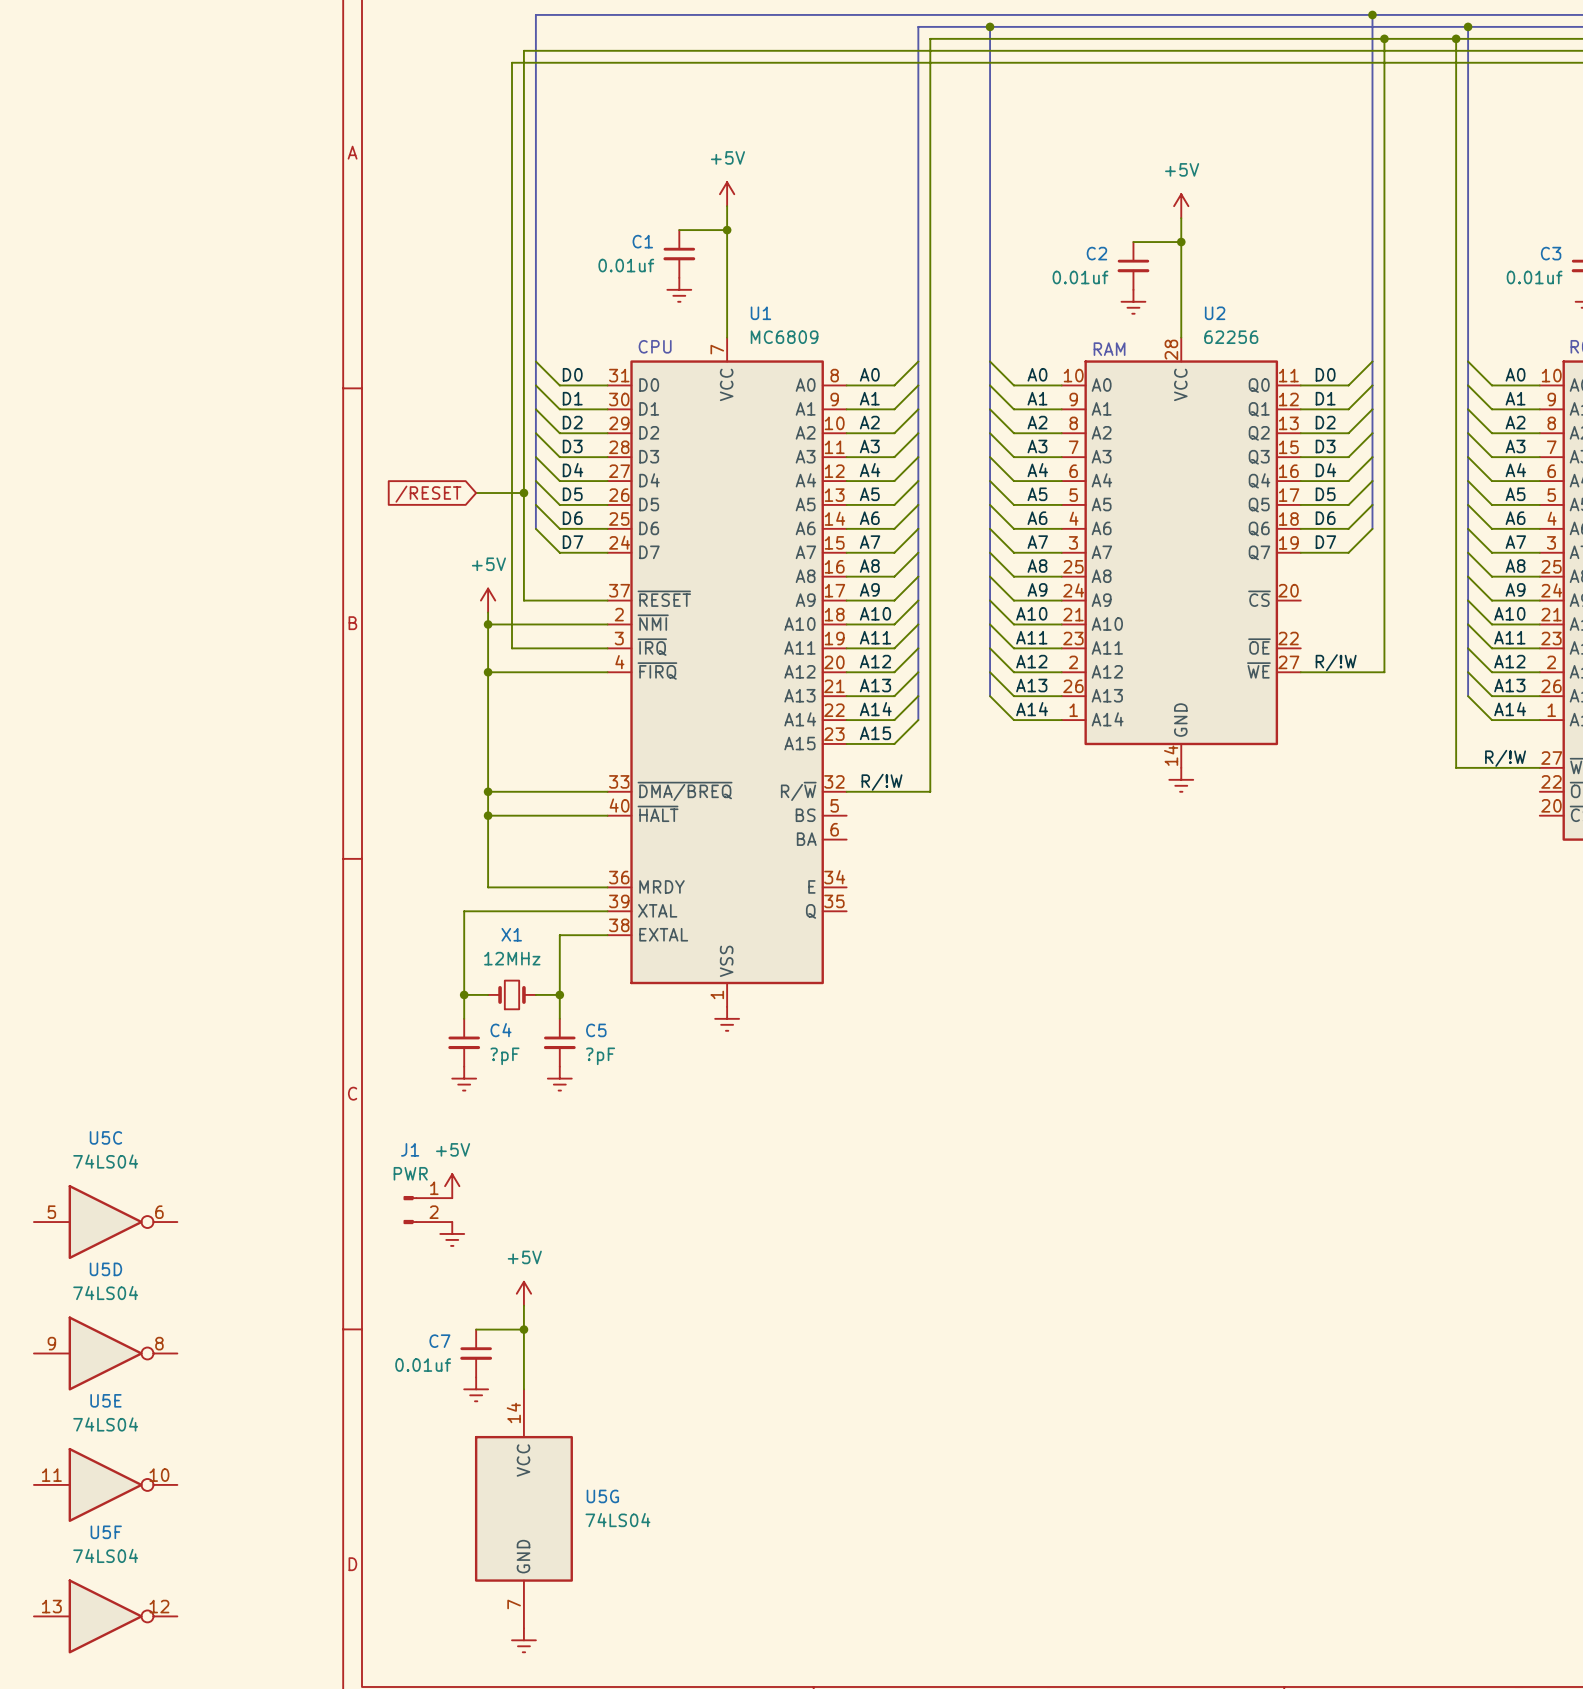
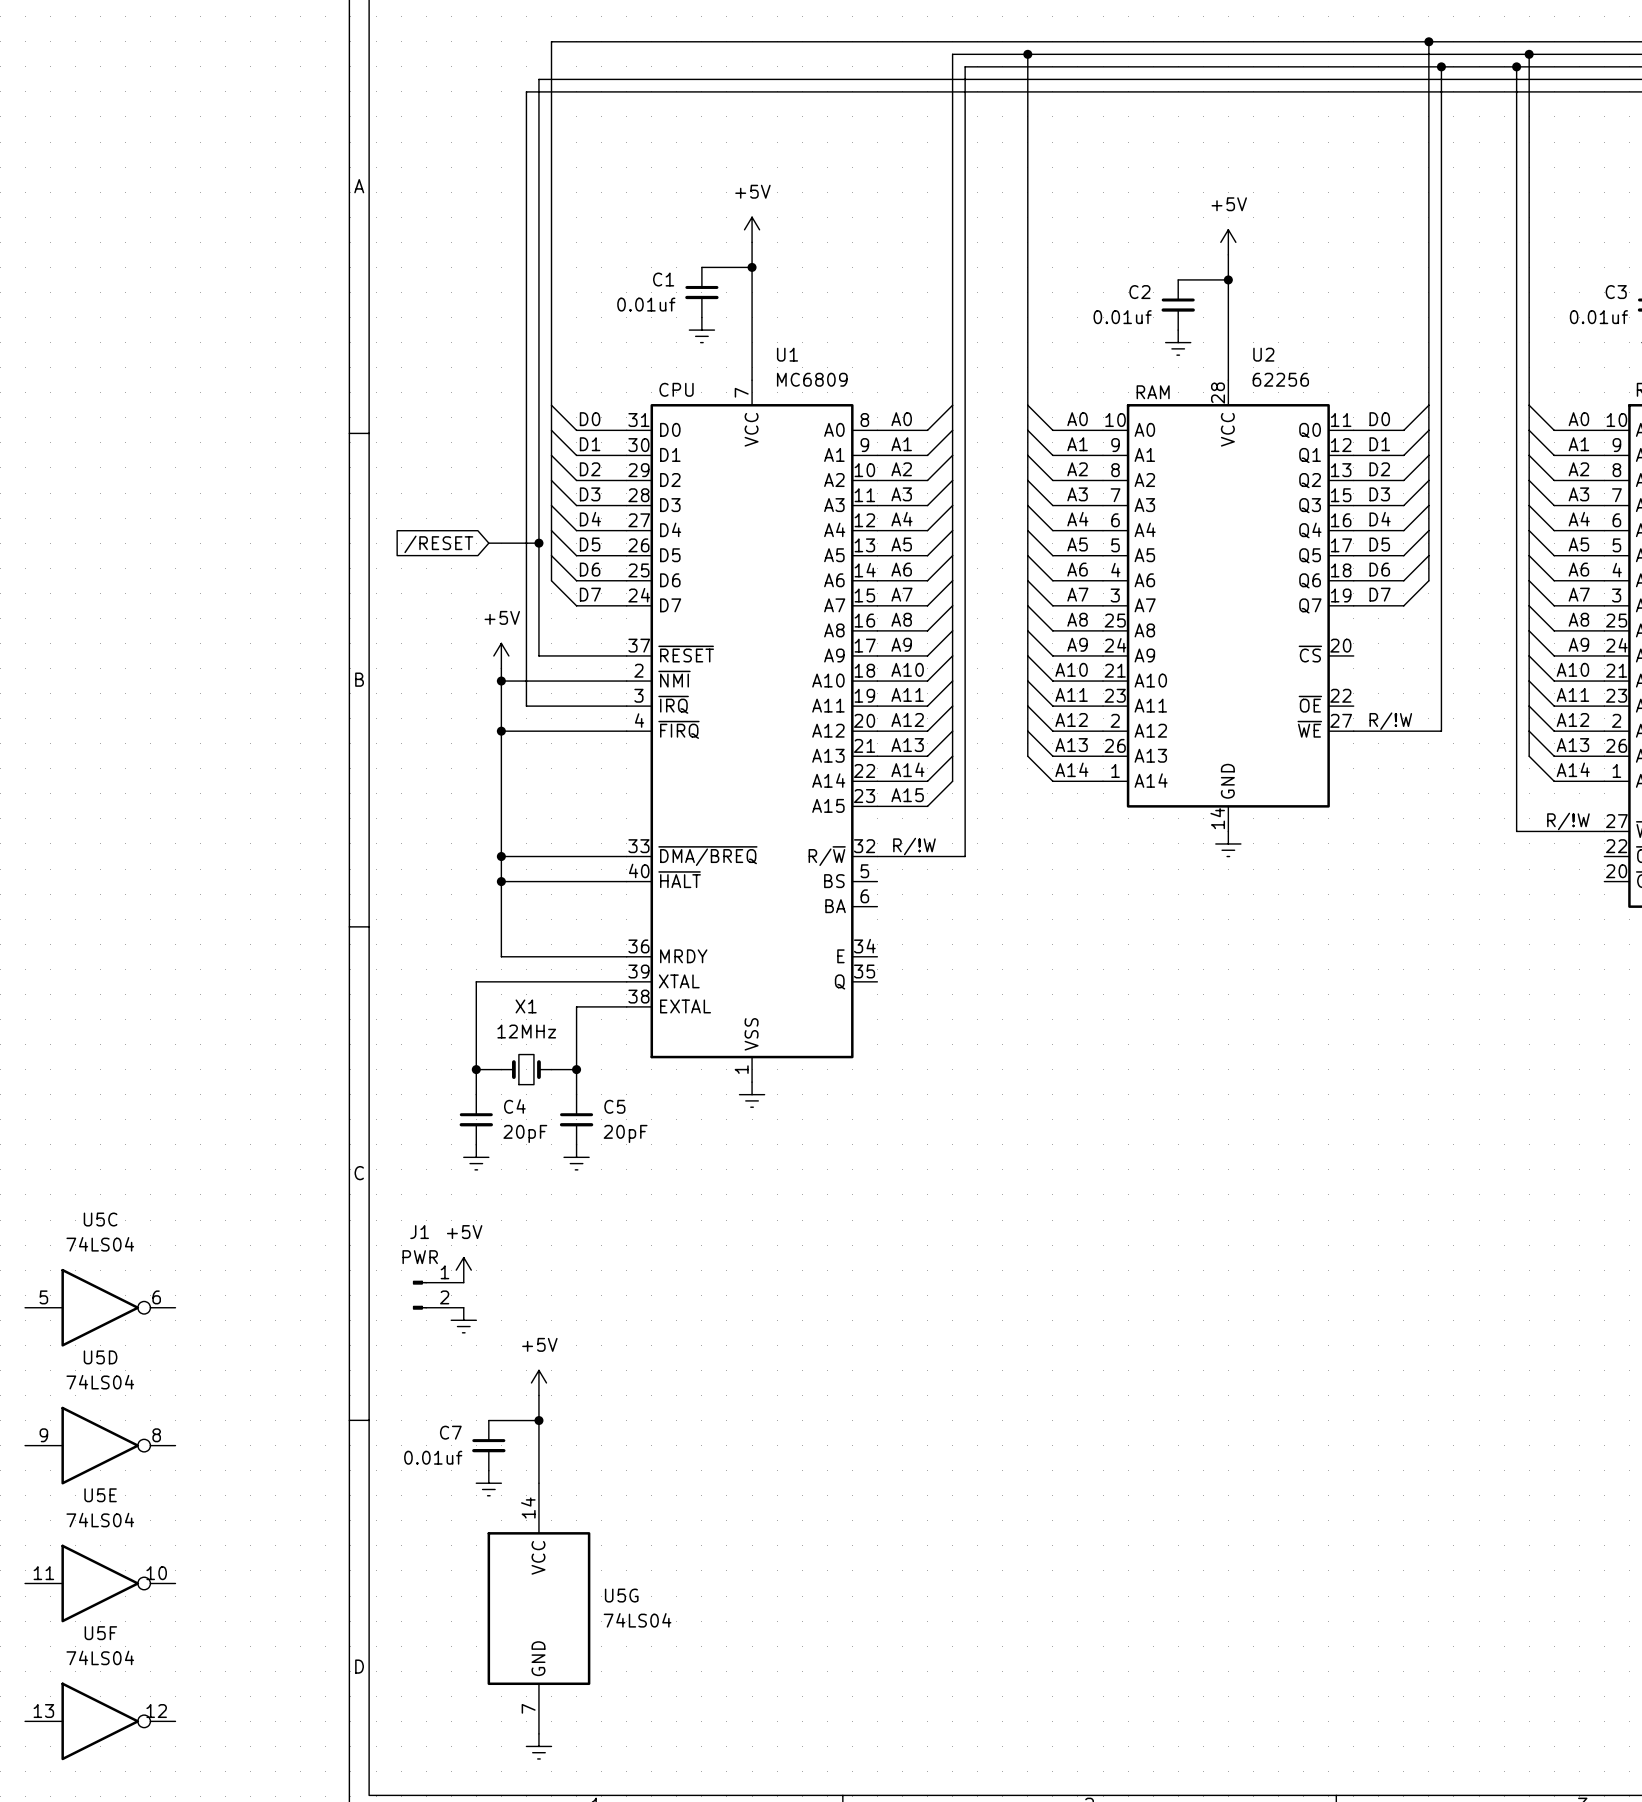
C4 value: ?pF (504, 1056) -> 20pF (525, 1133)
C5 value: ?pF (600, 1056) -> 20pF (625, 1133)

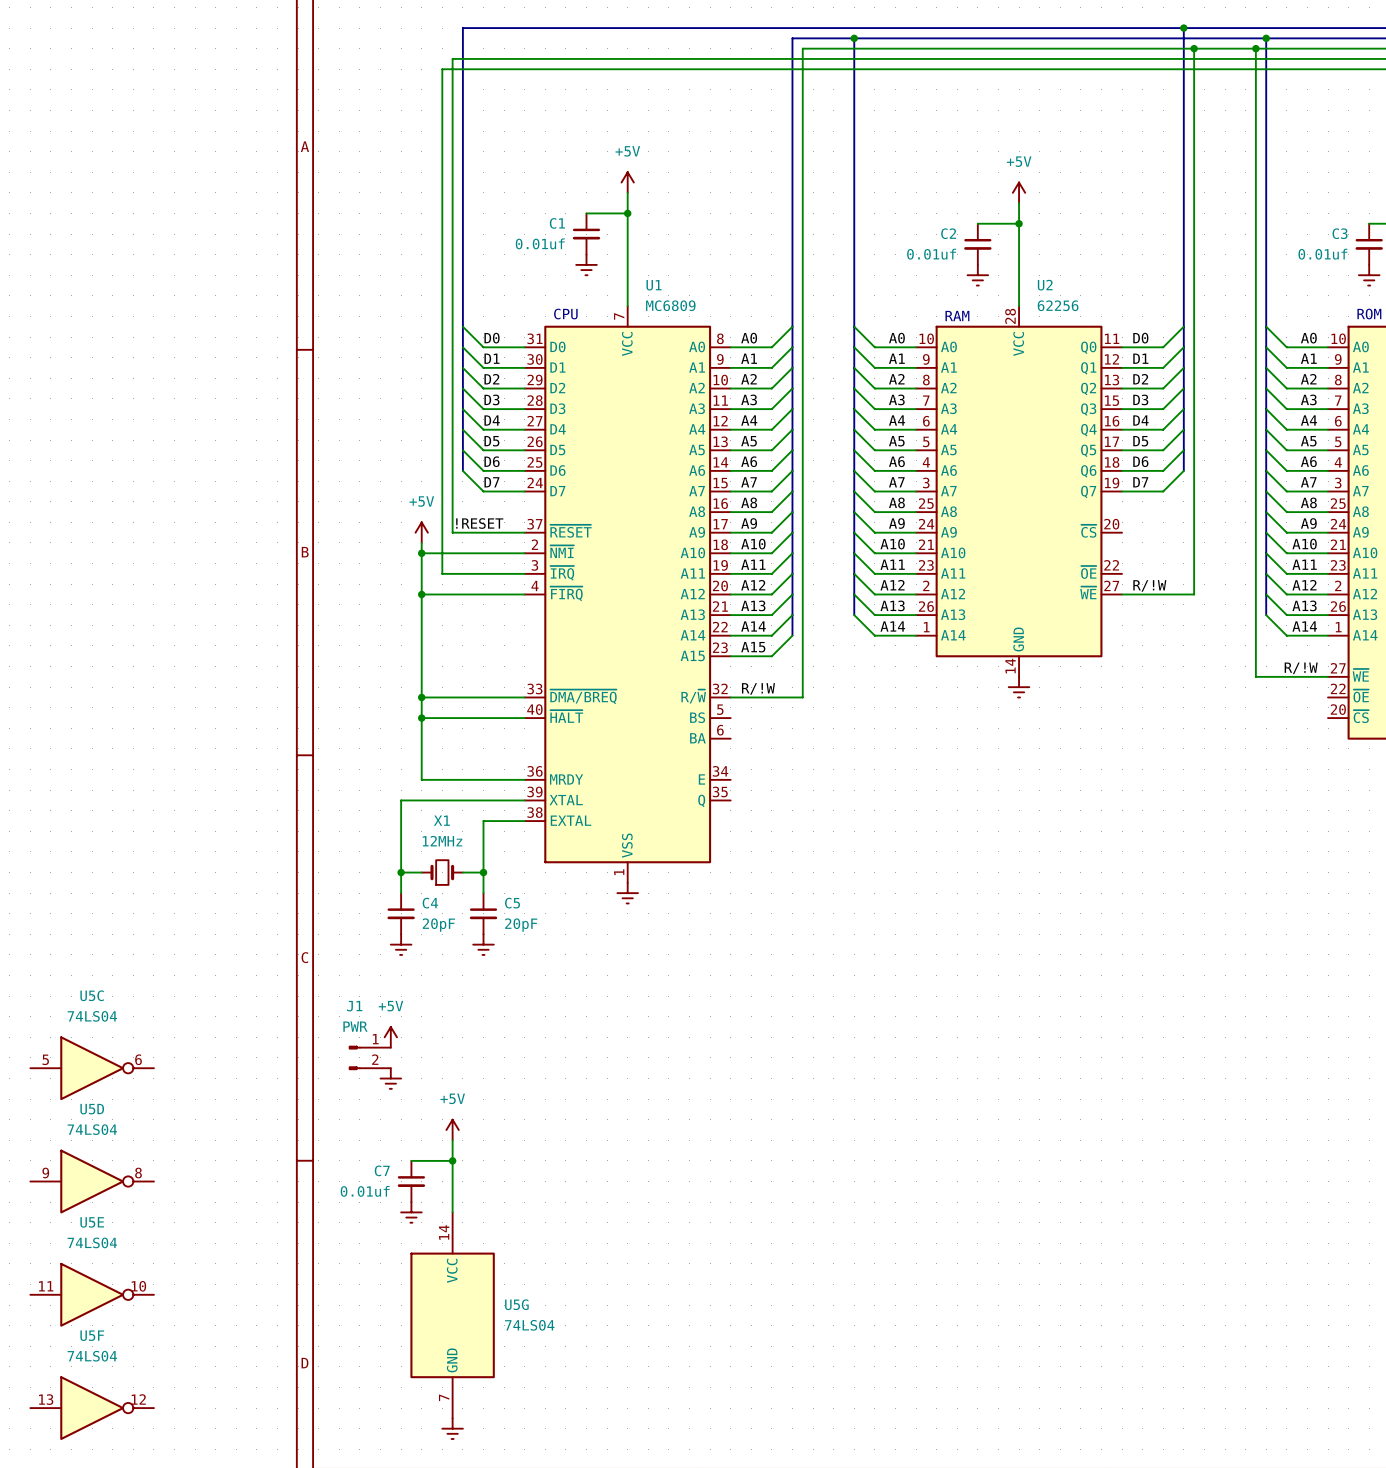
wire: (488, 543) (538, 543) -> none
junction: (538, 543) -> none
global label: /RESET (438, 544) -> none
label: none -> !RESET (479, 523)

